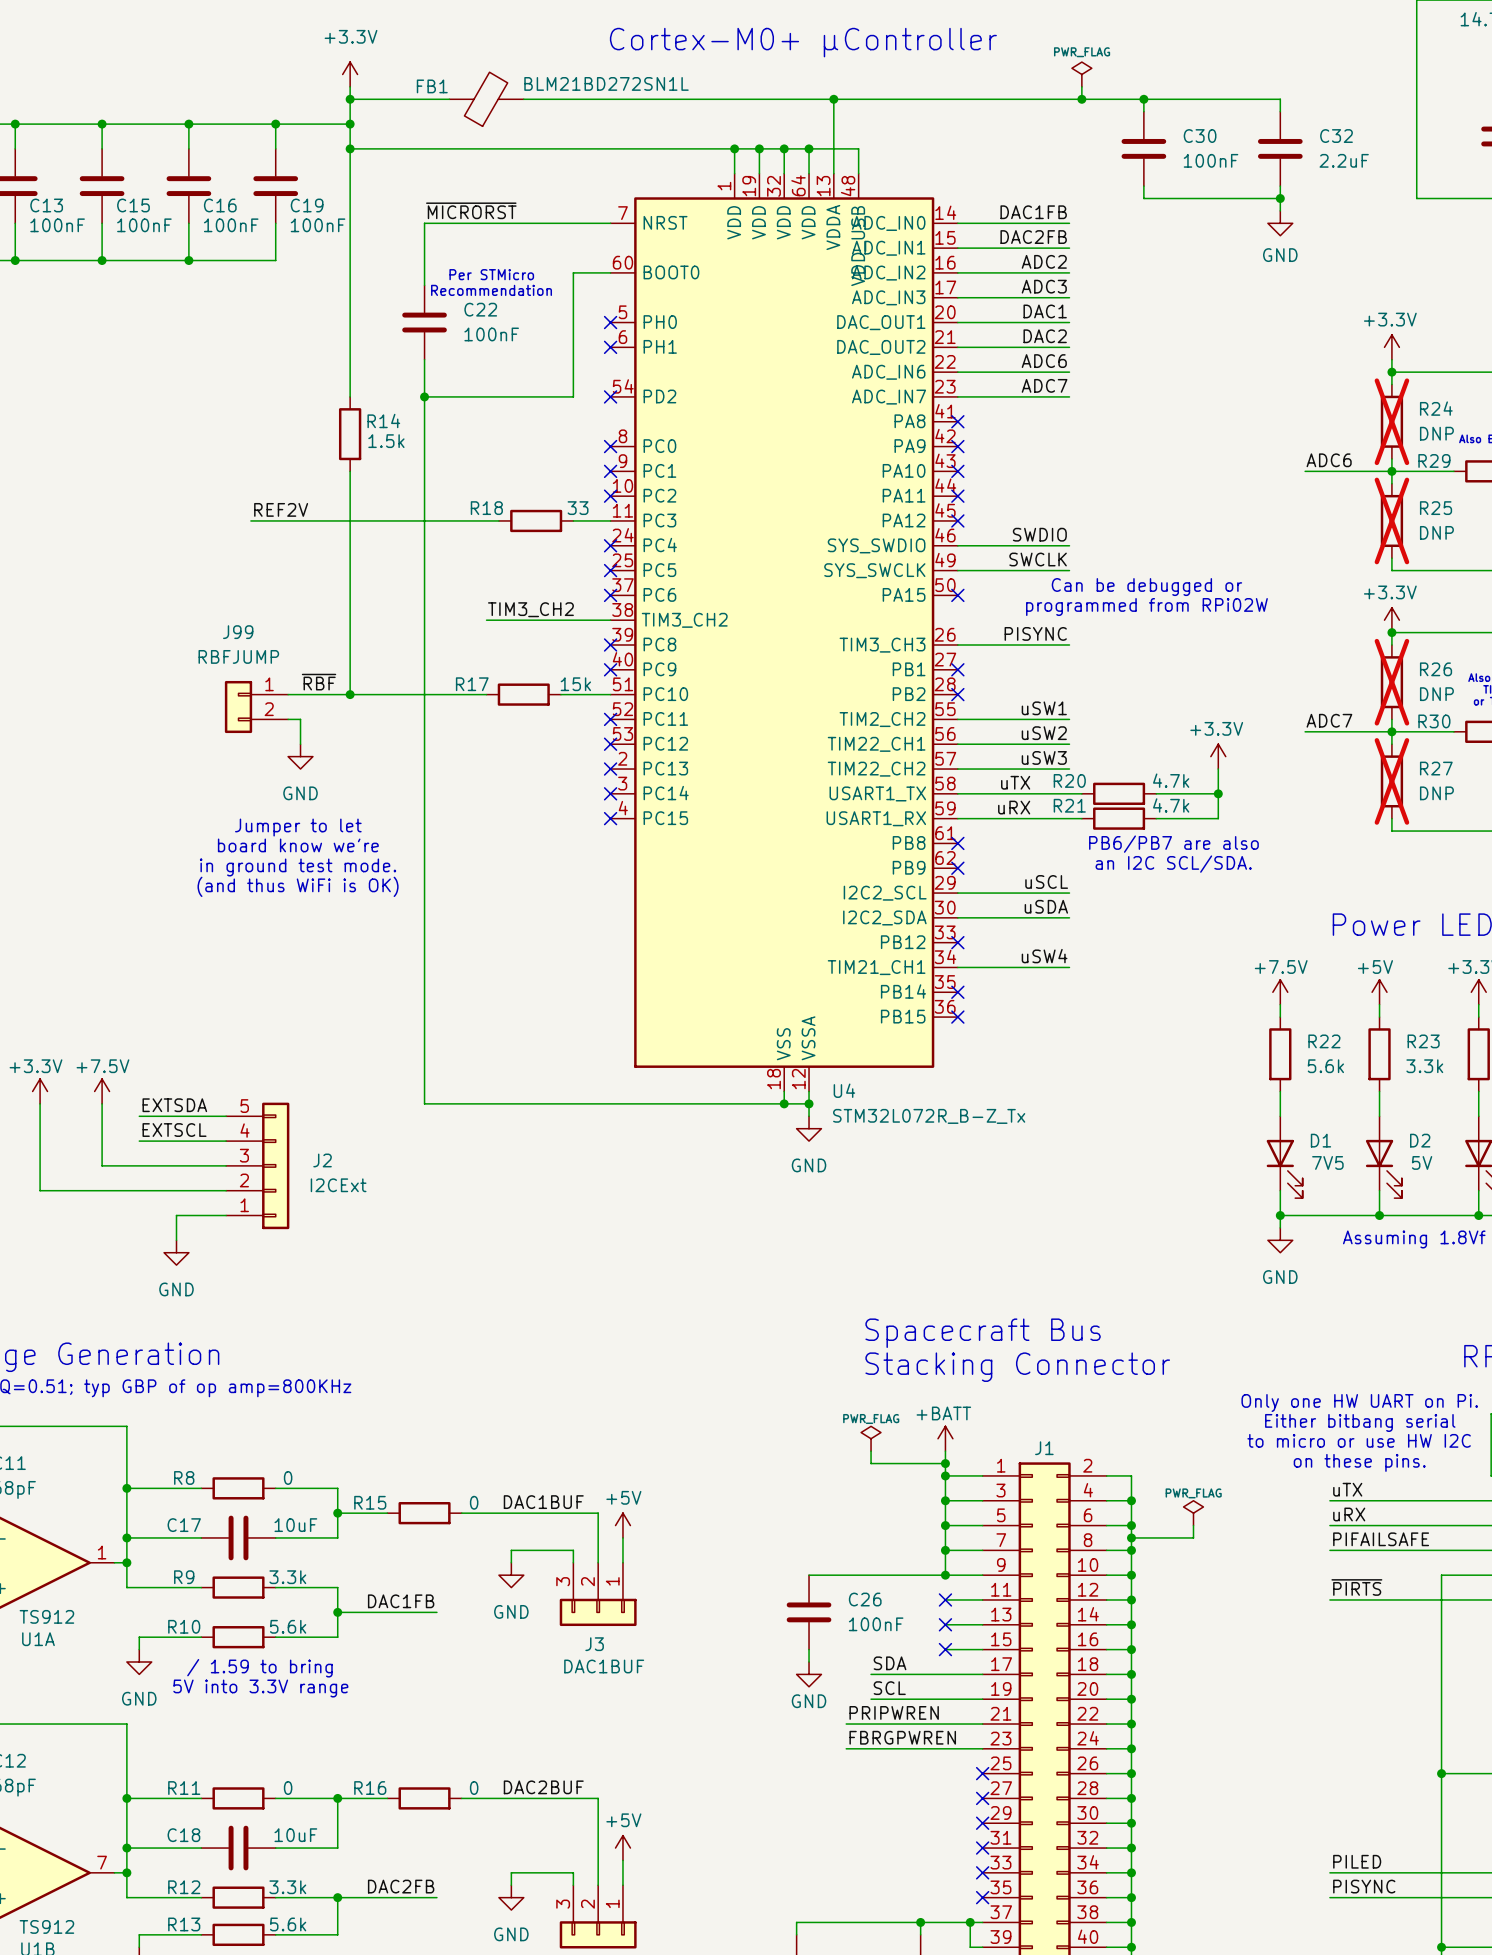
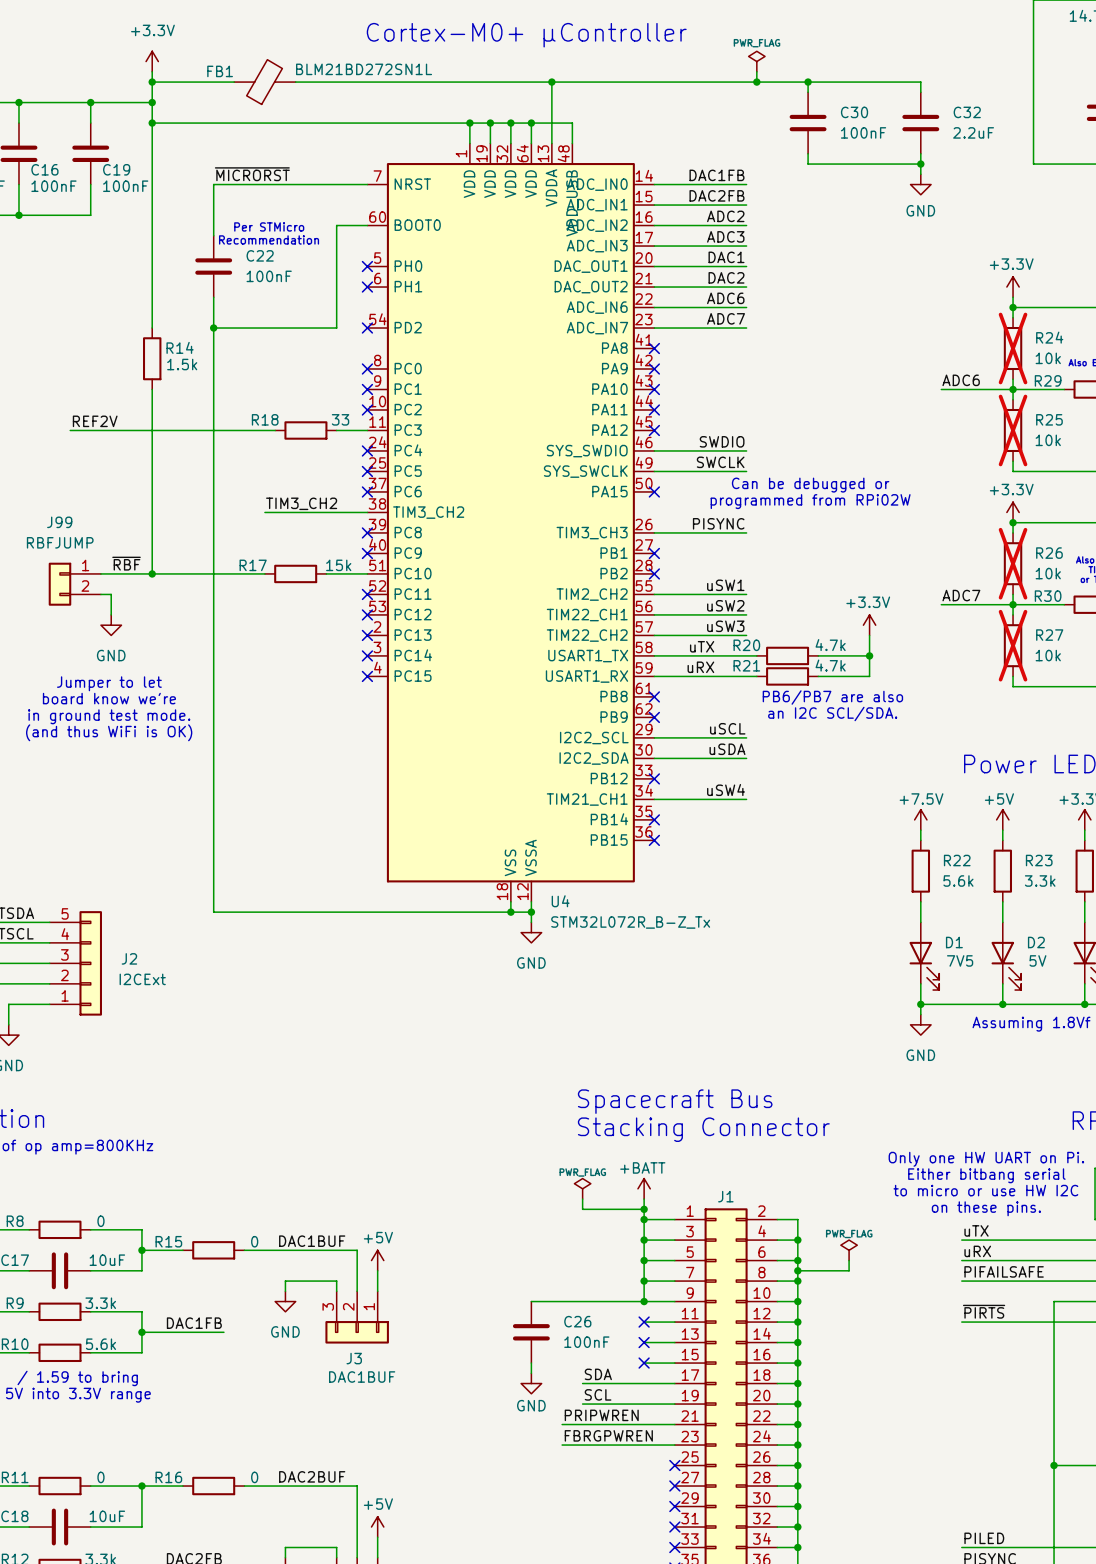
R24 value: DNP (1436, 433) -> 10k (1048, 358)
R25 value: DNP (1436, 532) -> 10k (1048, 440)
R26 value: DNP (1436, 694) -> 10k (1048, 573)
R27 value: DNP (1436, 793) -> 10k (1048, 655)

